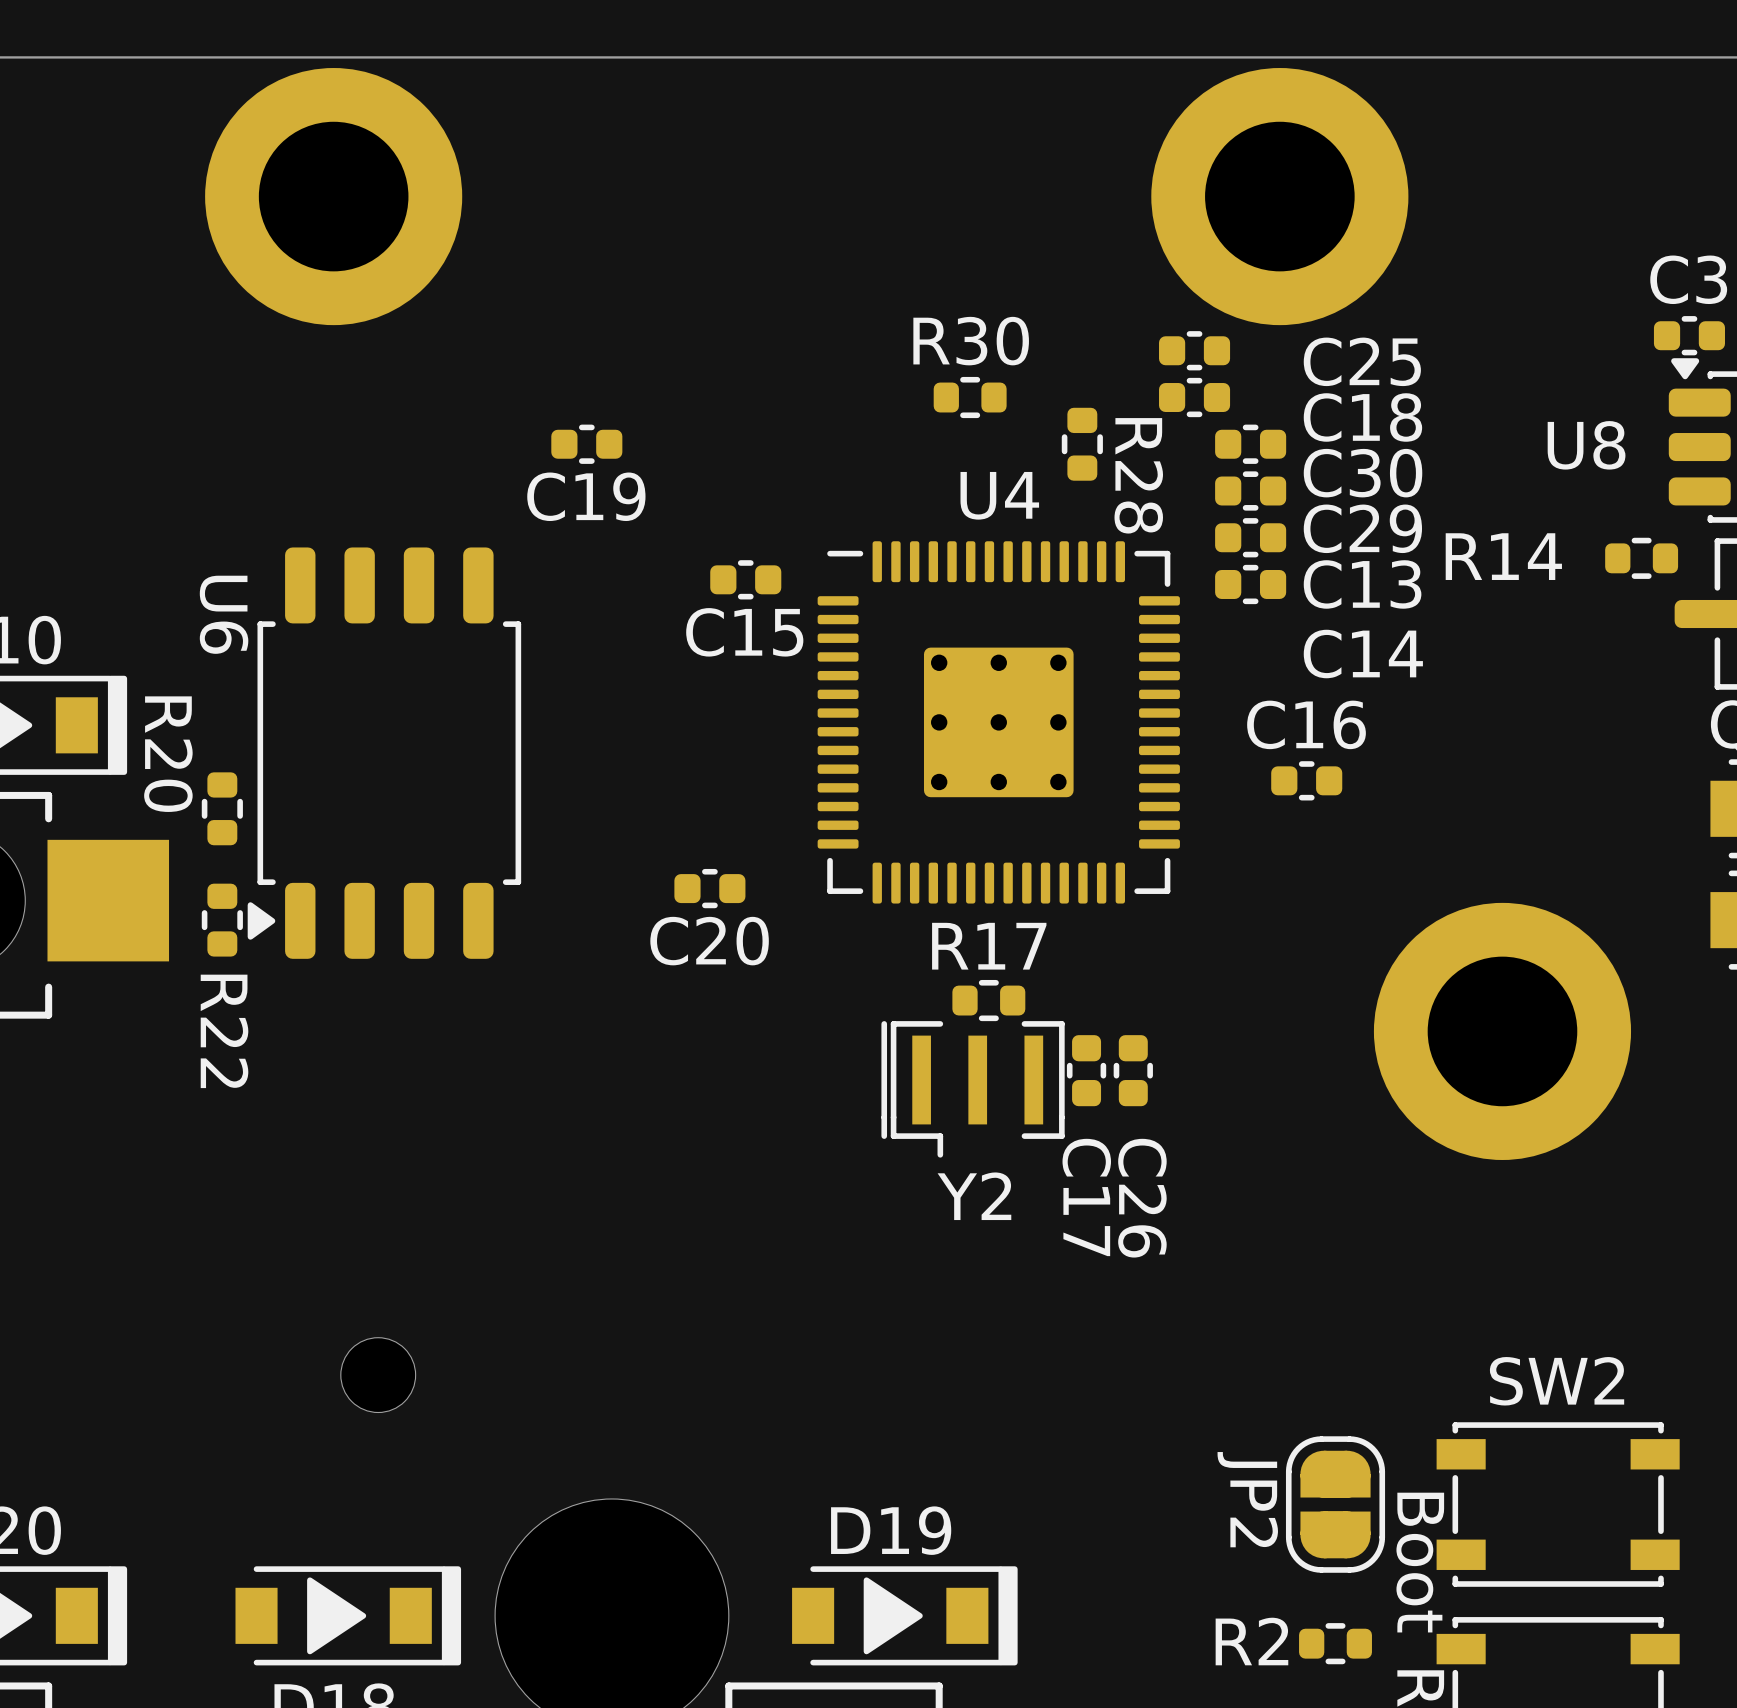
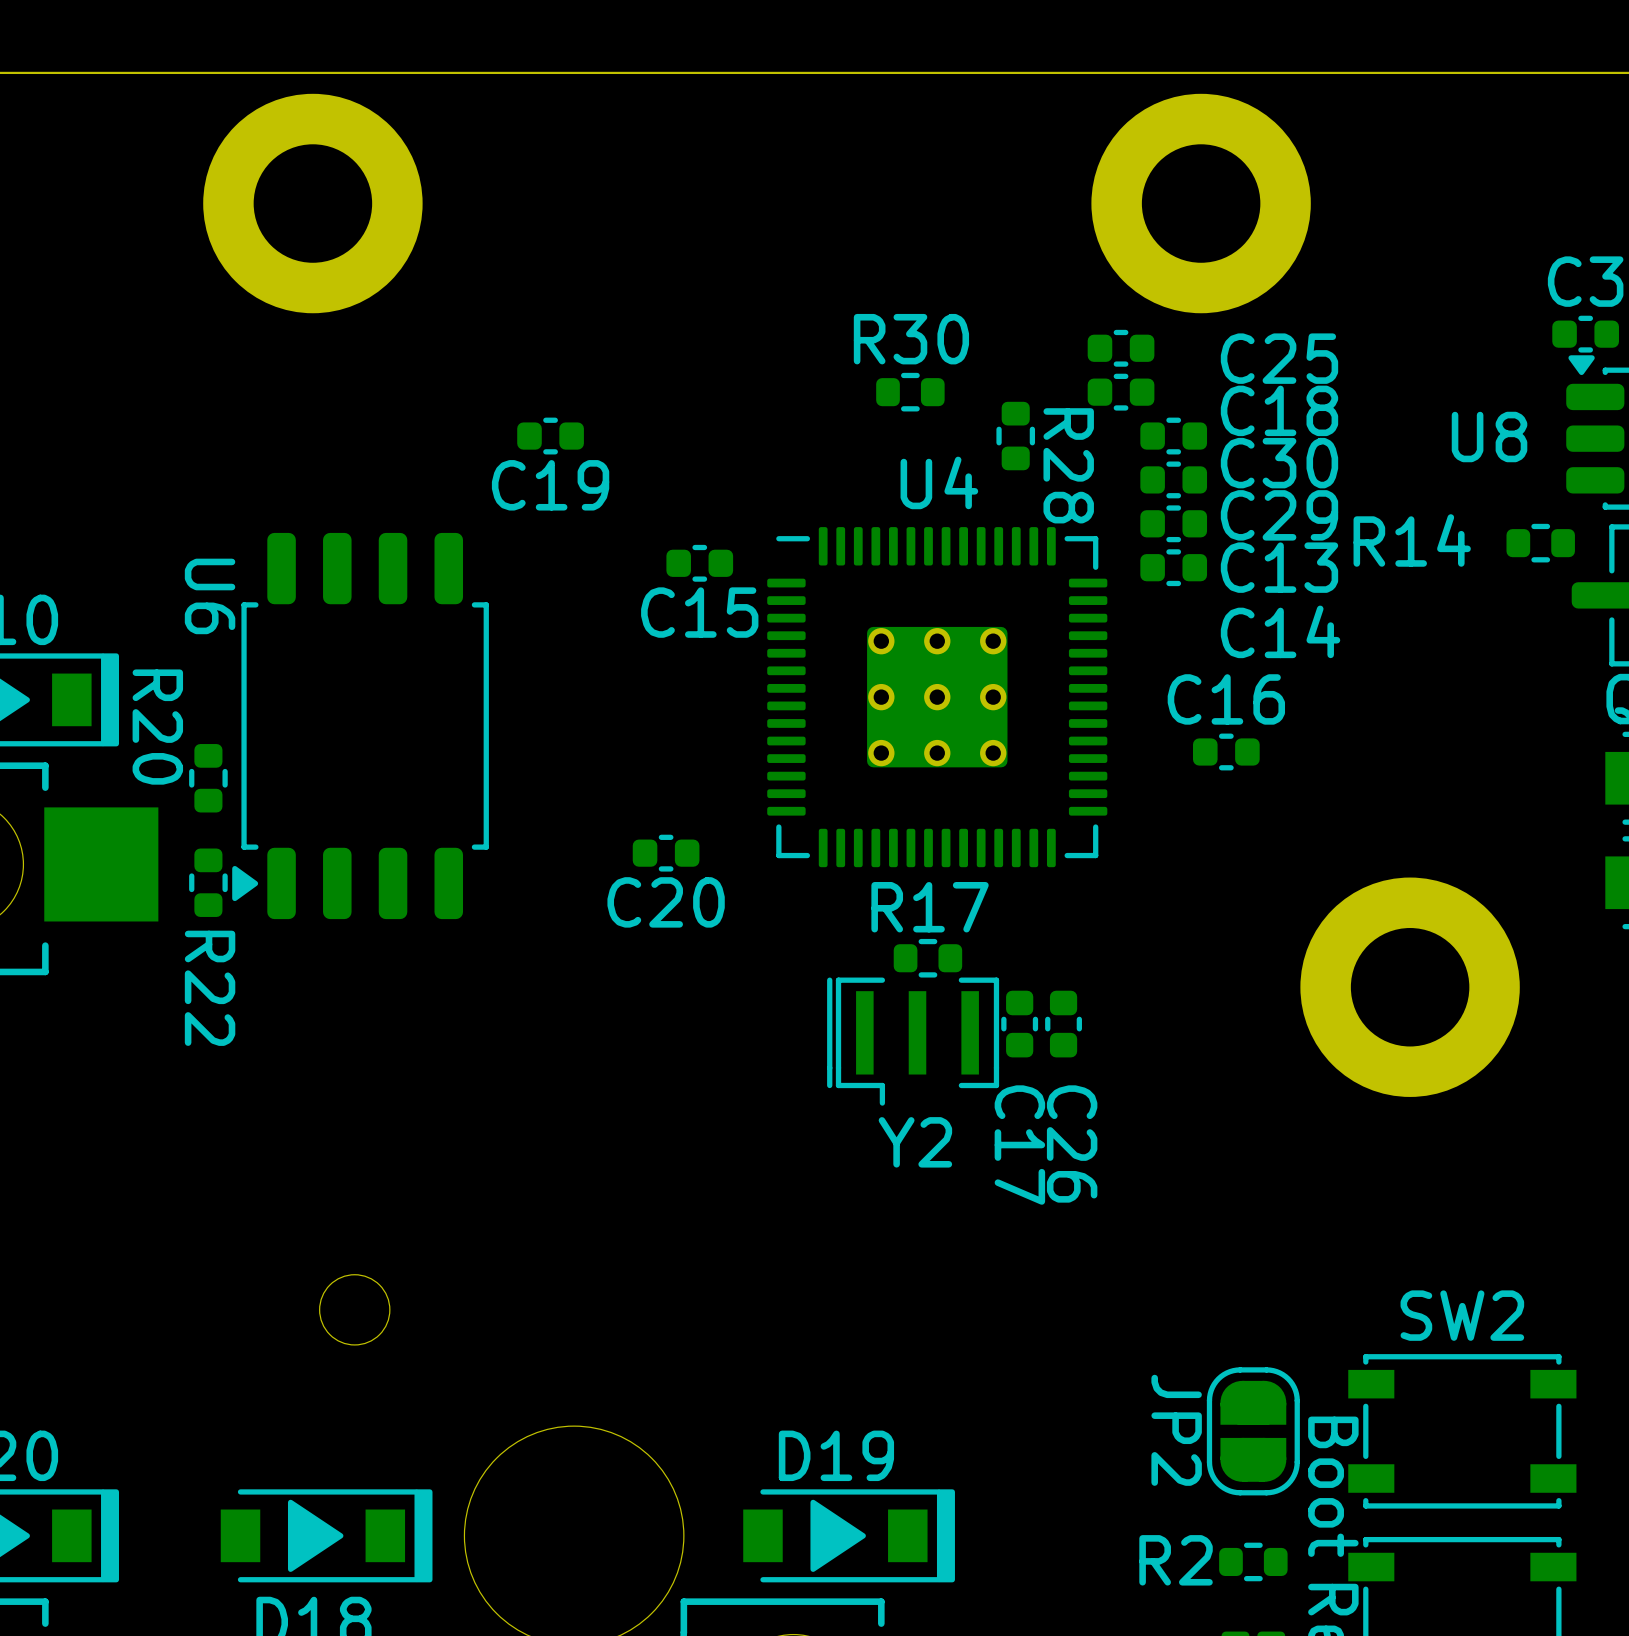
part footprint: [205, 68, 463, 326] -> [203, 93, 423, 314]
part footprint: [1151, 68, 1409, 326] -> [1091, 93, 1311, 314]
part footprint: [1373, 902, 1632, 1160] -> [1300, 877, 1520, 1097]

